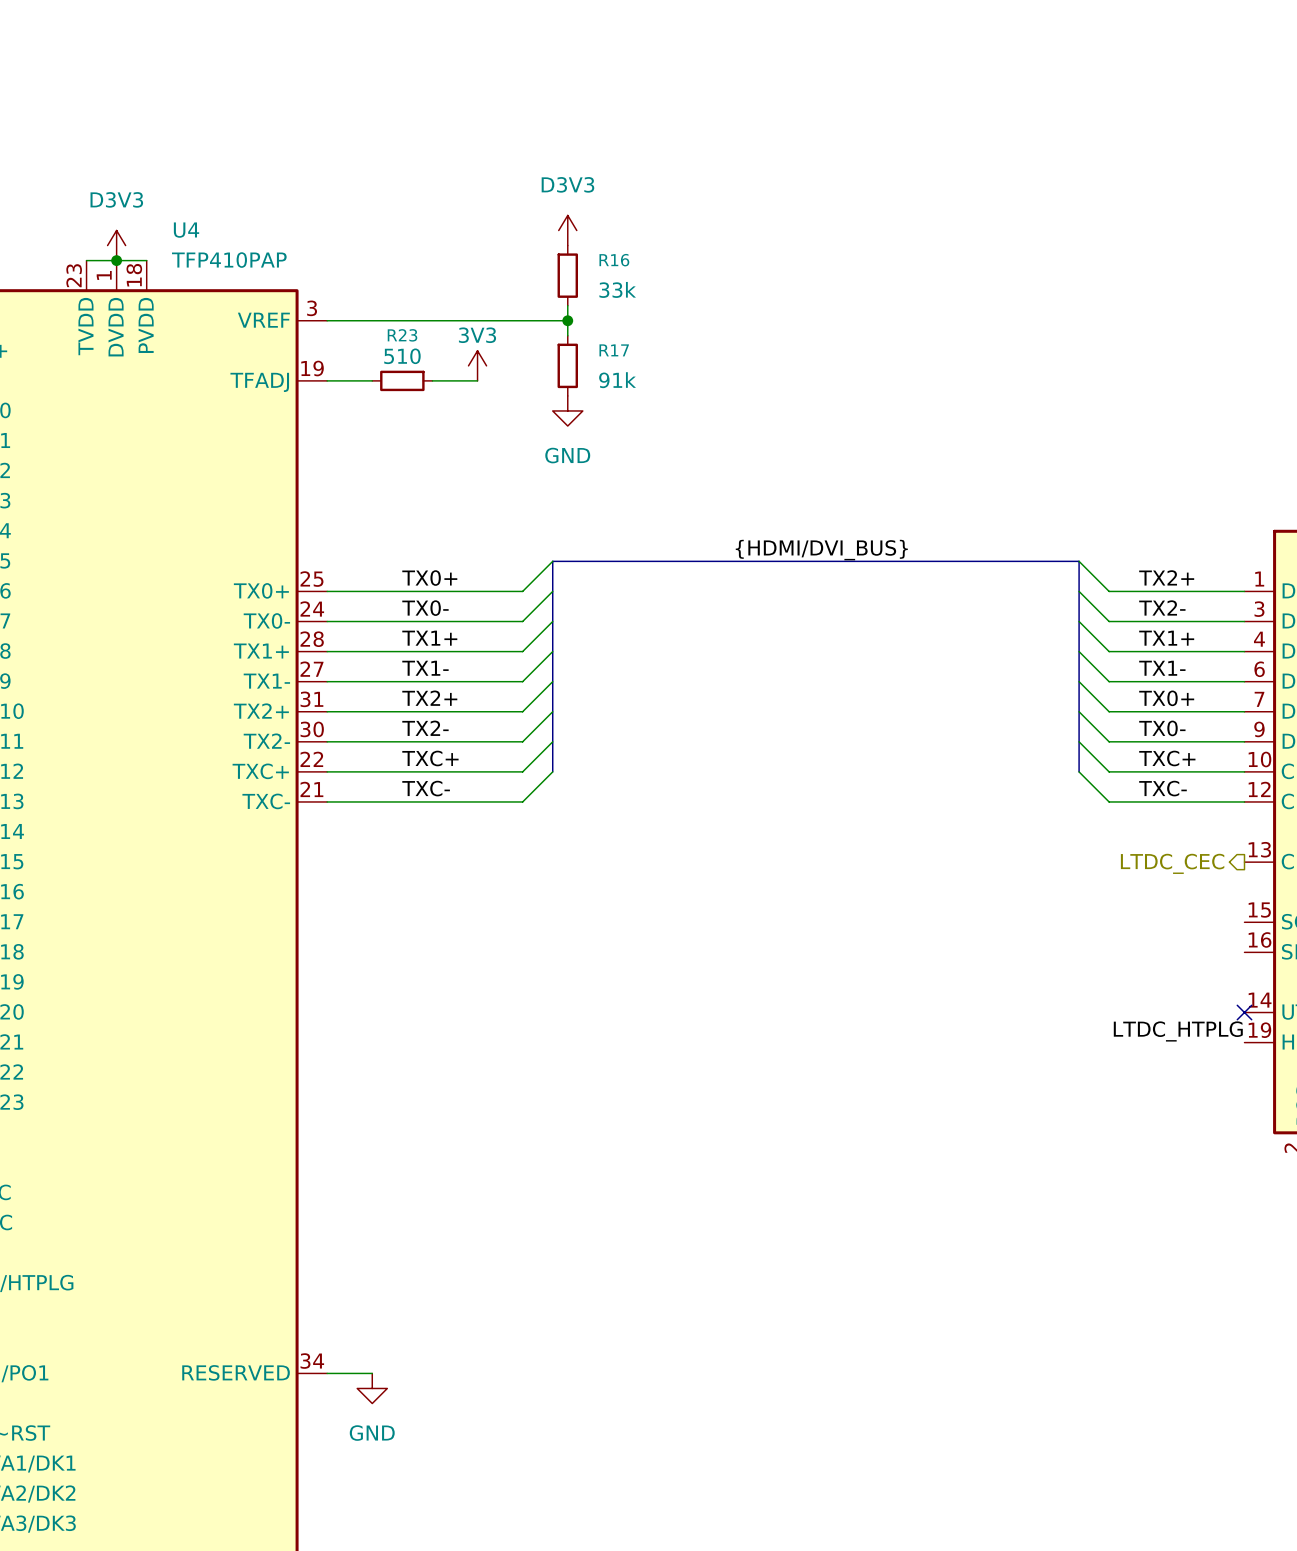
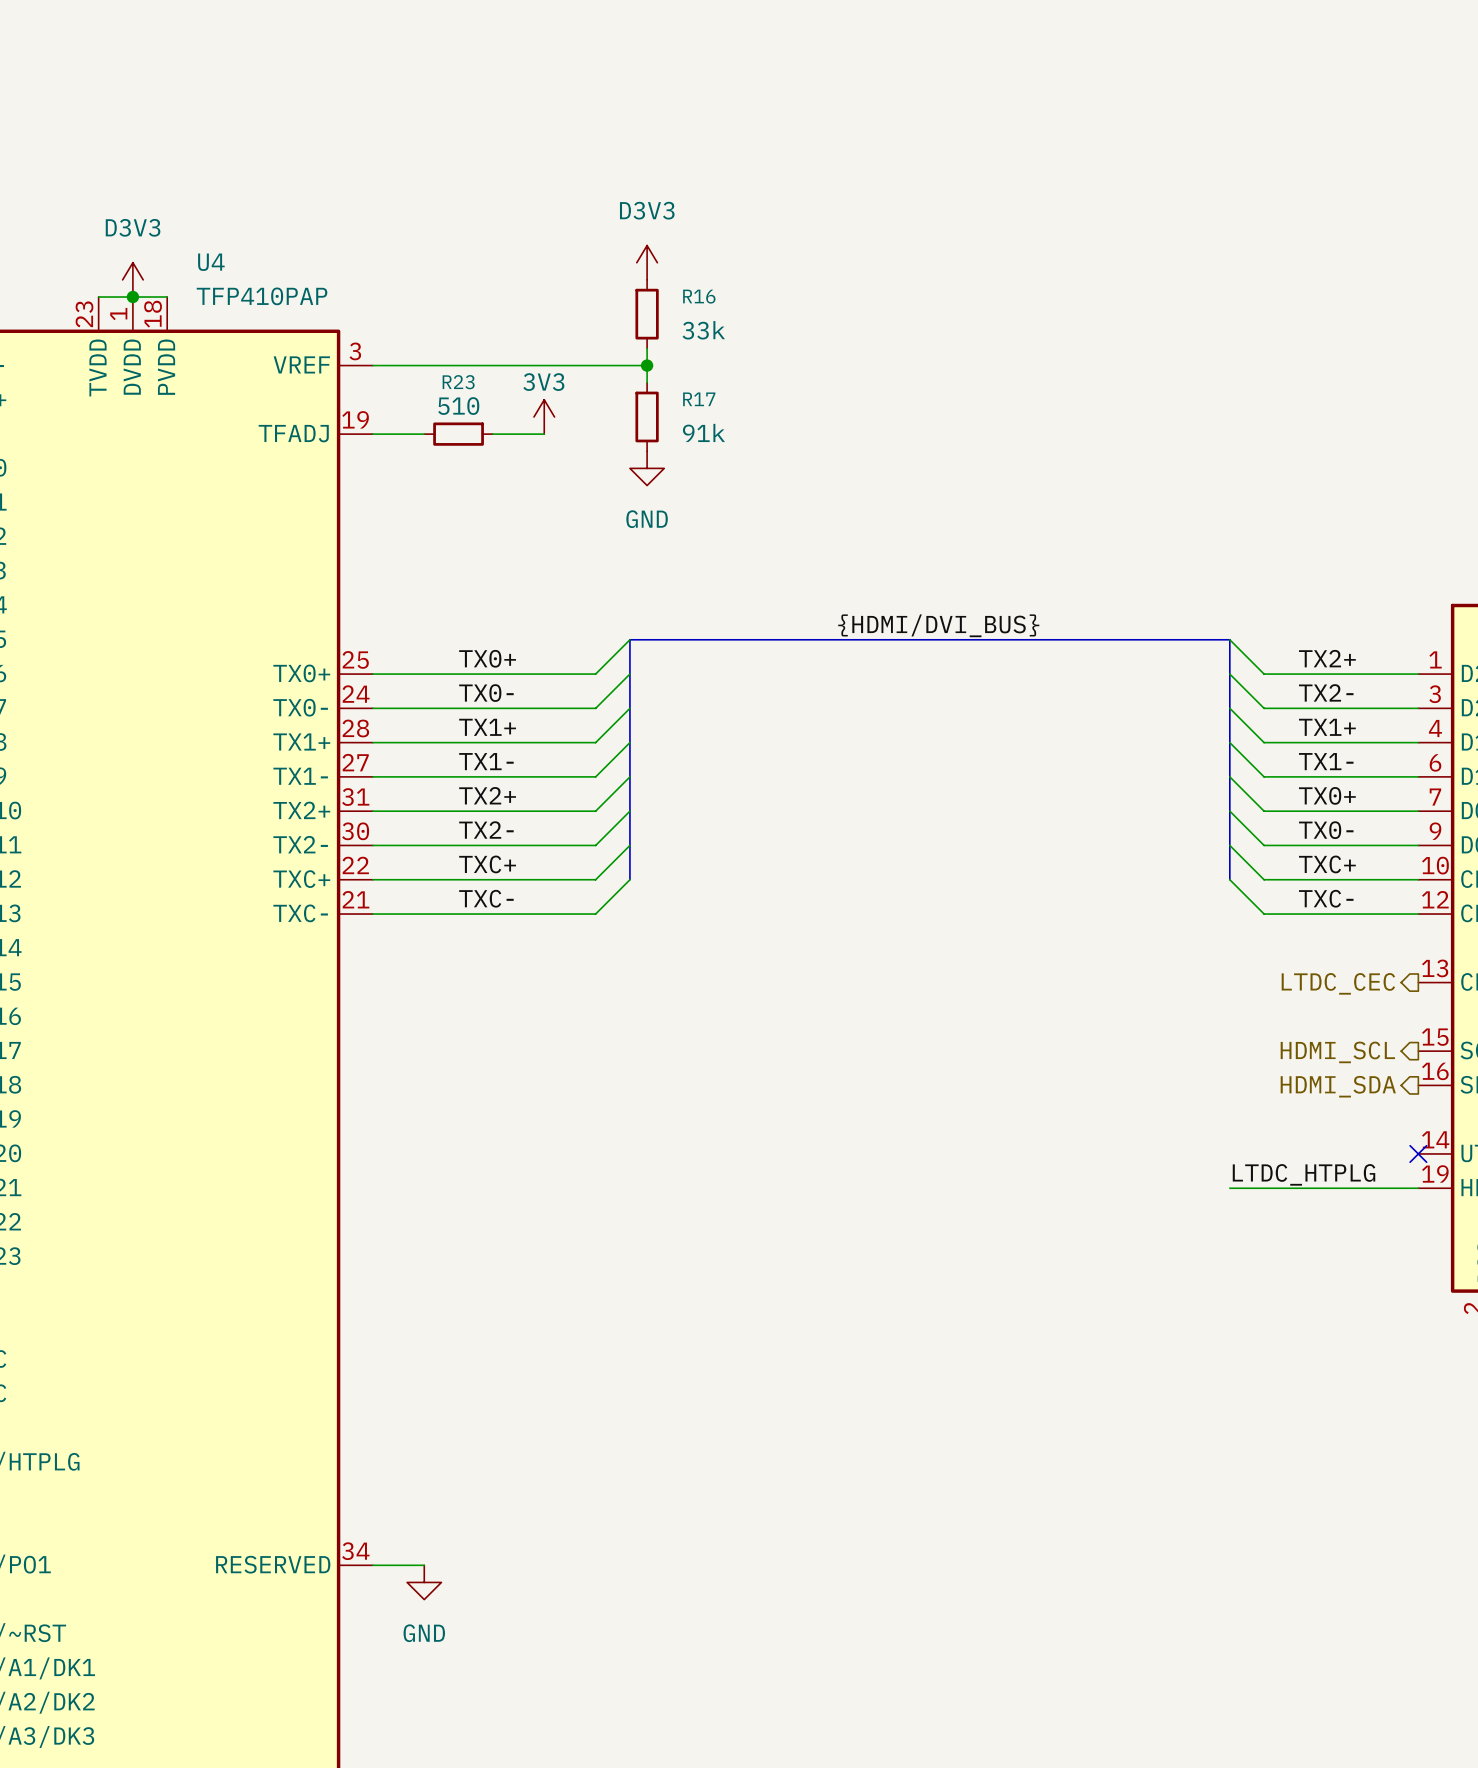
hierarchical label: none -> HDMI_SCL (1337, 1052)
hierarchical label: none -> HDMI_SDA (1338, 1086)
label position: LTDC_HTPLG (1178, 1031) -> LTDC_HTPLG (1304, 1174)
wire: none -> (1229, 1188) (1418, 1188)

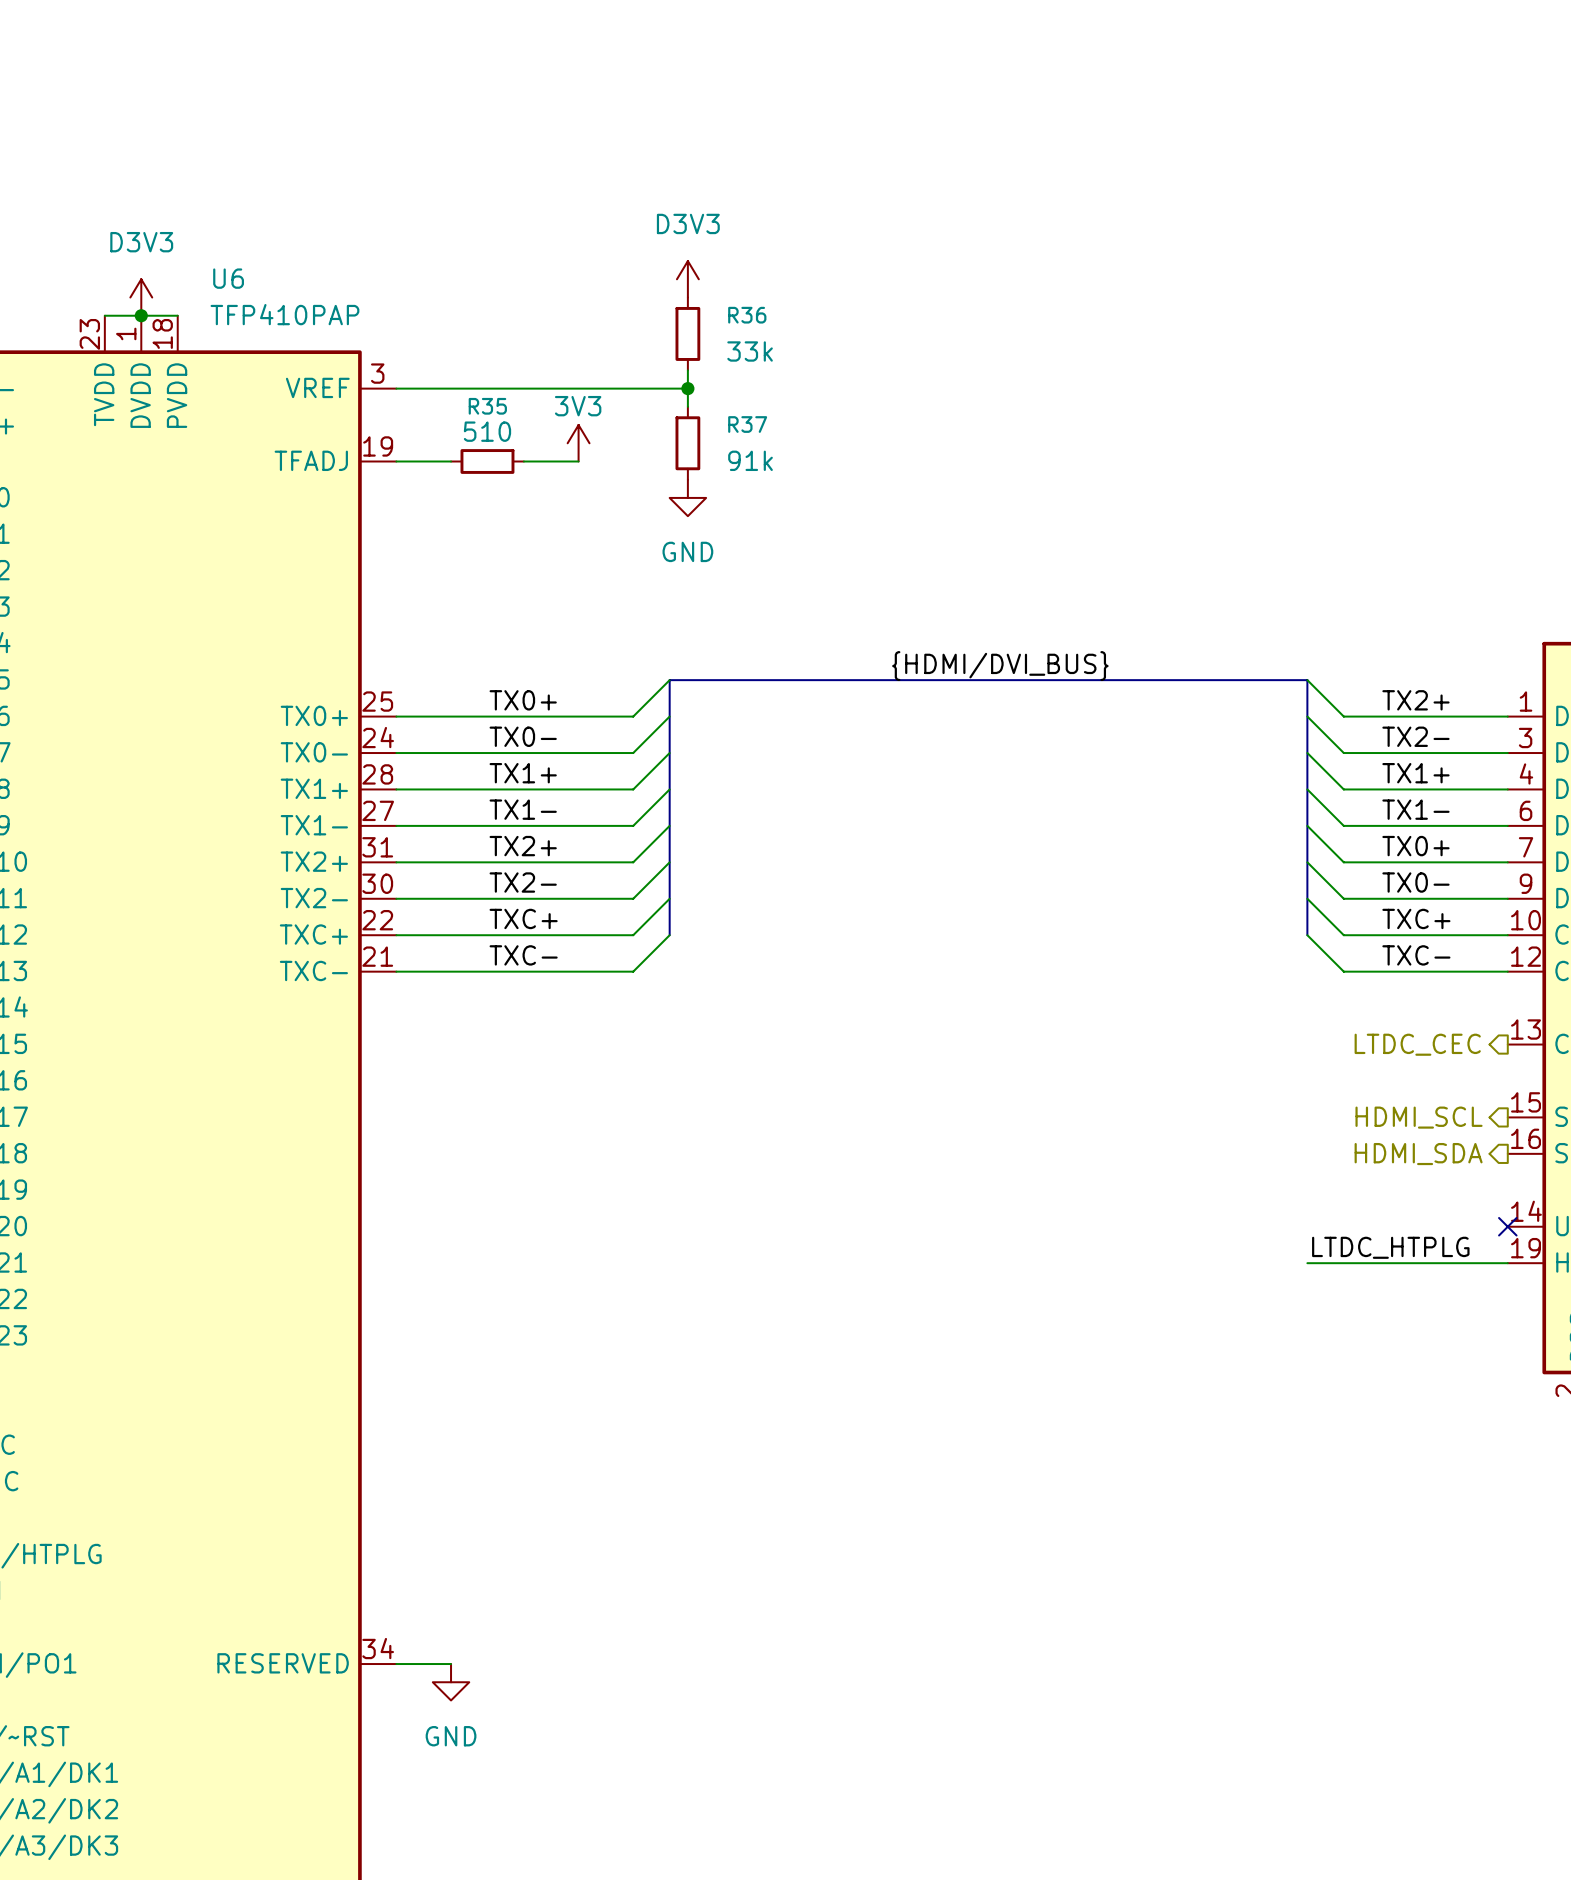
U4 name: U4 (211, 262) -> U6 (228, 278)
R16 name: R16 (699, 296) -> R36 (747, 315)
R23 name: R23 (458, 382) -> R35 (487, 406)
R17 name: R17 (699, 399) -> R37 (747, 424)

